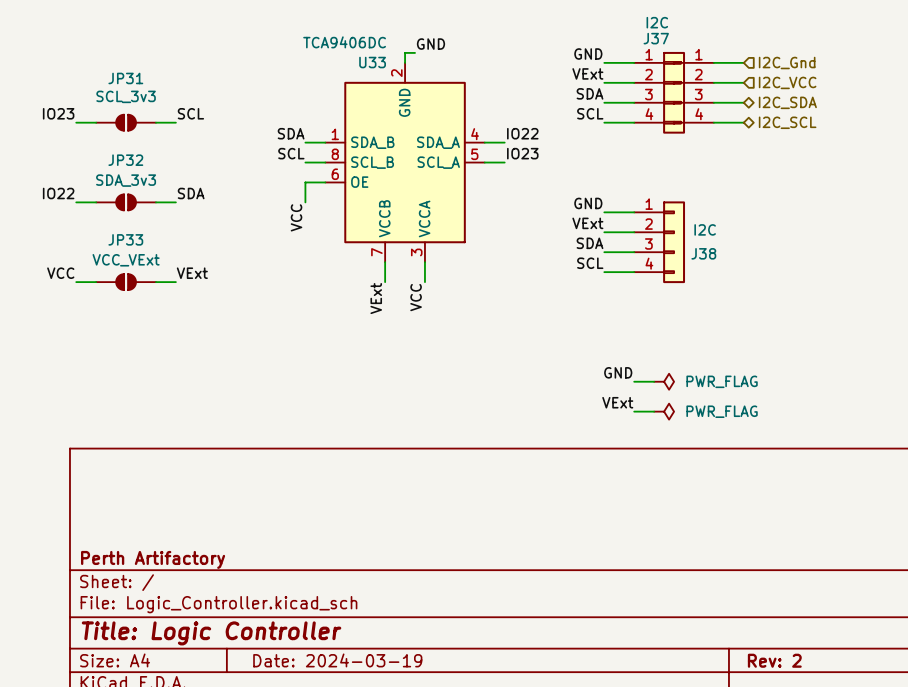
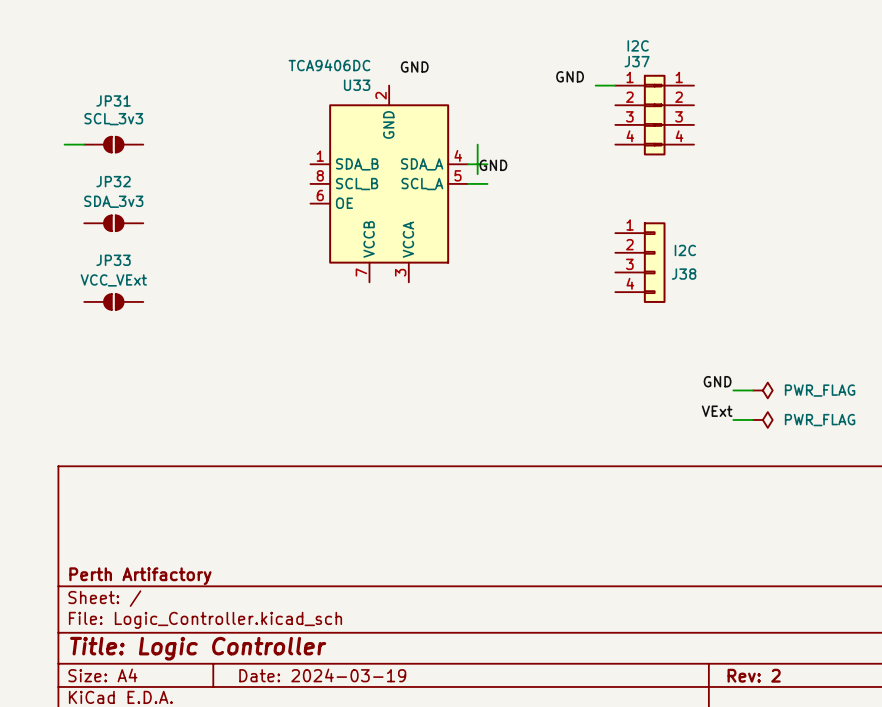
wire: (415, 52) (405, 52) (405, 62) -> none
wire: (604, 62) (614, 62) -> none
wire: (713, 62) (743, 62) -> none
hierarchical label: I2C_Gnd (787, 63) -> none
label: VExt (587, 73) -> none
wire: (604, 82) (634, 82) -> none
wire: (713, 82) (743, 82) -> none
hierarchical label: I2C_VCC (787, 82) -> none
label: SDA (590, 93) -> none
wire: (604, 102) (634, 102) -> none
wire: (713, 102) (743, 102) -> none
hierarchical label: I2C_SDA (787, 102) -> none
label: IO23 (58, 113) -> none
label: SCL (190, 113) -> none
label: SCL (590, 113) -> none
wire: (155, 122) (175, 122) -> none
wire: none -> (477, 144) (477, 174)
wire: (604, 122) (634, 122) -> none
wire: (713, 122) (743, 122) -> none
hierarchical label: I2C_SCL (787, 122) -> none
label: SDA (291, 133) -> none
label: IO22 (522, 133) -> none
wire: (305, 142) (325, 142) -> none
label: none -> GND (493, 165)
label: SCL (291, 153) -> none
label: IO23 (522, 153) -> none
wire: (305, 162) (325, 162) -> none
wire: (325, 182) (305, 182) (305, 202) -> none
label: IO22 (58, 193) -> none
label: SDA (191, 193) -> none
wire: (76, 202) (96, 202) -> none
wire: (155, 202) (175, 202) -> none
label: GND (588, 203) -> none
wire: (604, 212) (634, 212) -> none
label: VCC (296, 217) -> none
label: VExt (587, 223) -> none
wire: (604, 232) (634, 232) -> none
label: SDA (590, 243) -> none
wire: (604, 252) (634, 252) -> none
wire: (385, 262) (385, 282) -> none
wire: (424, 262) (424, 282) -> none
label: SCL (590, 263) -> none
wire: (604, 272) (634, 272) -> none
label: VCC (60, 273) -> none
label: VExt (192, 273) -> none
wire: (76, 282) (96, 282) -> none
wire: (155, 282) (175, 282) -> none
label: VCC (416, 297) -> none
label: VExt (376, 298) -> none
label: none -> GND (717, 381)
power symbol: none -> PWR_FLAG (762, 390)
label: GND (618, 372) -> none
wire: (634, 381) (654, 381) -> (733, 390) (753, 390)
power symbol: PWR_FLAG (664, 381) -> none
label: none -> VExt (717, 411)
power symbol: none -> PWR_FLAG (762, 419)
label: VExt (617, 402) -> none
wire: (634, 411) (654, 411) -> (733, 419) (753, 419)
power symbol: PWR_FLAG (664, 411) -> none

